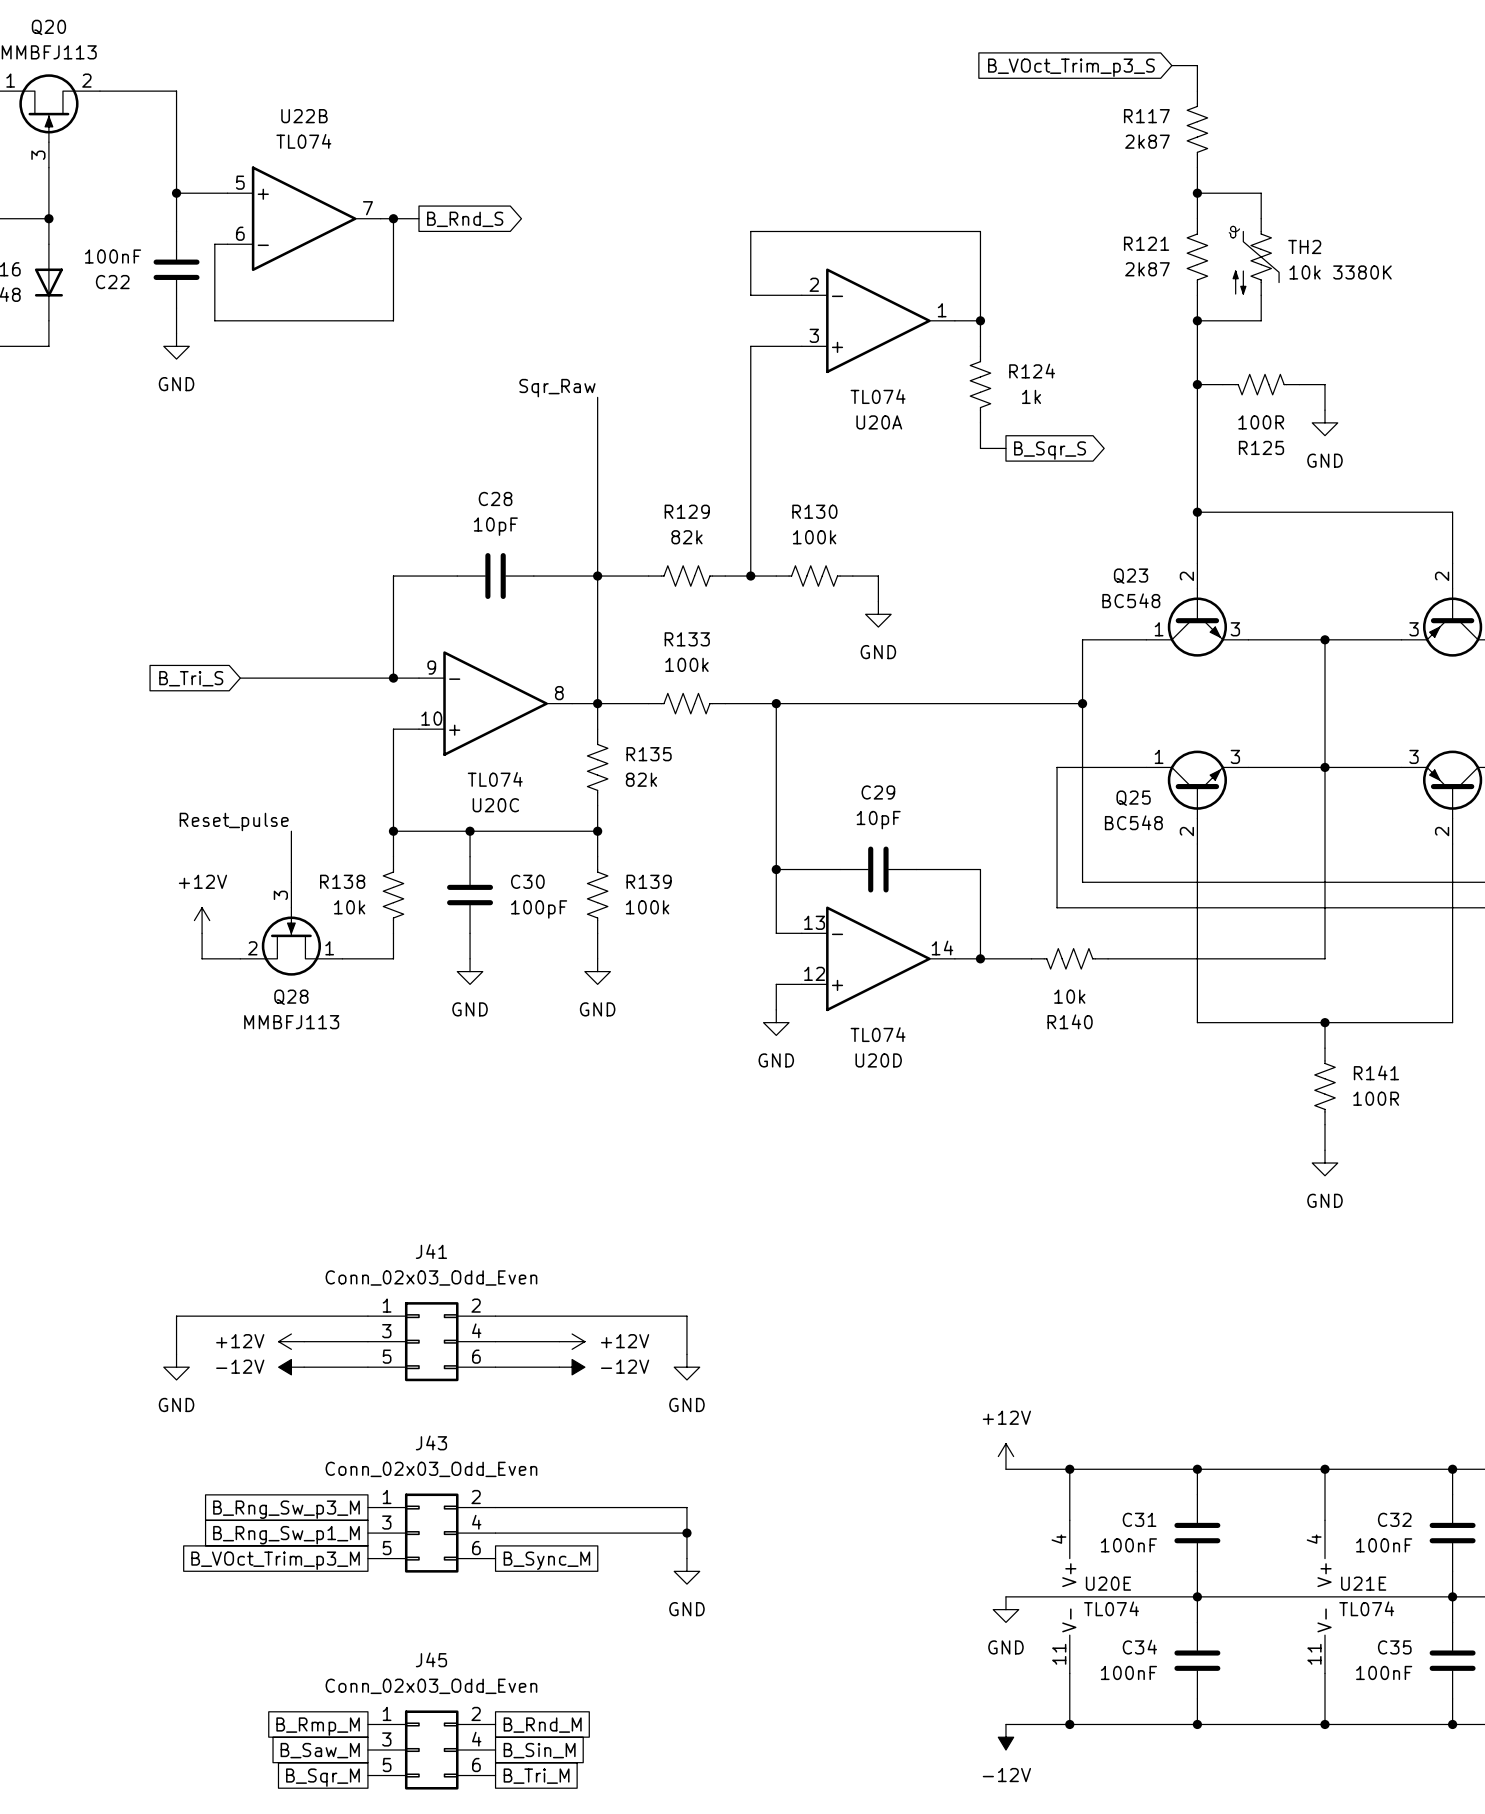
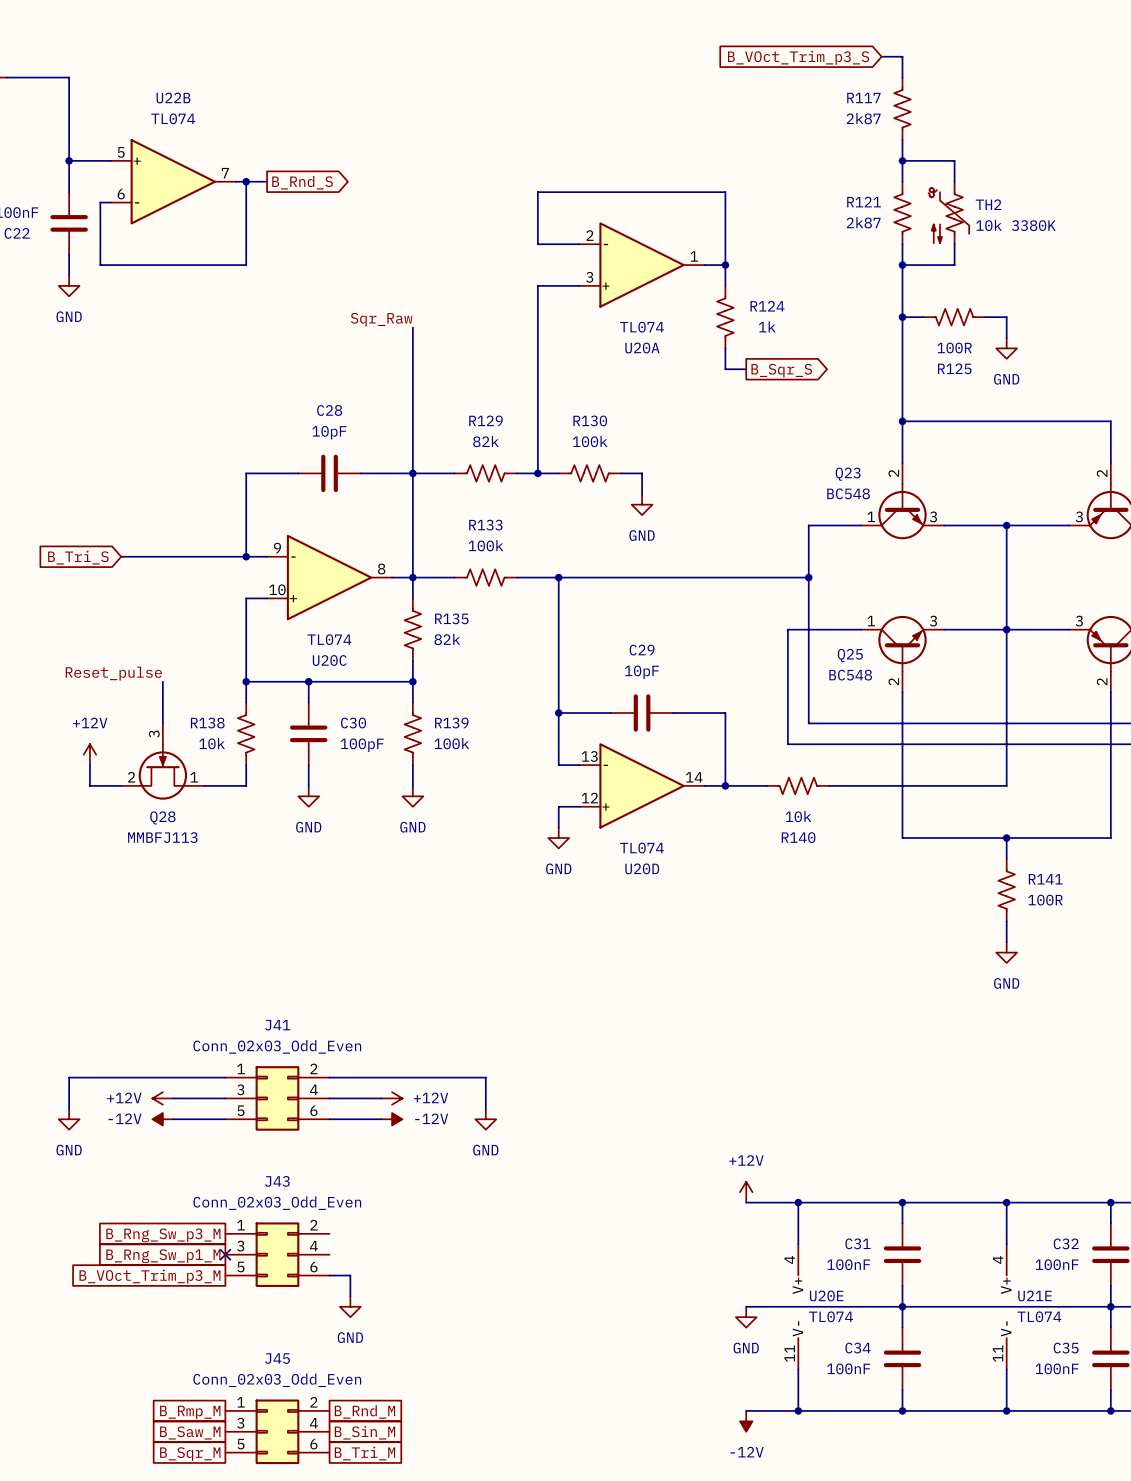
wire: (495, 1507) (686, 1507) (686, 1558) -> none
no-connect mark: none -> (225, 1254)
wire: (495, 1533) (686, 1533) -> none
junction: (686, 1533) -> none
wire: none -> (329, 1275) (350, 1275) (350, 1296)
global label: B_Sync_M (546, 1560) -> none
power symbol position: GND (686, 1571) -> GND (350, 1306)

